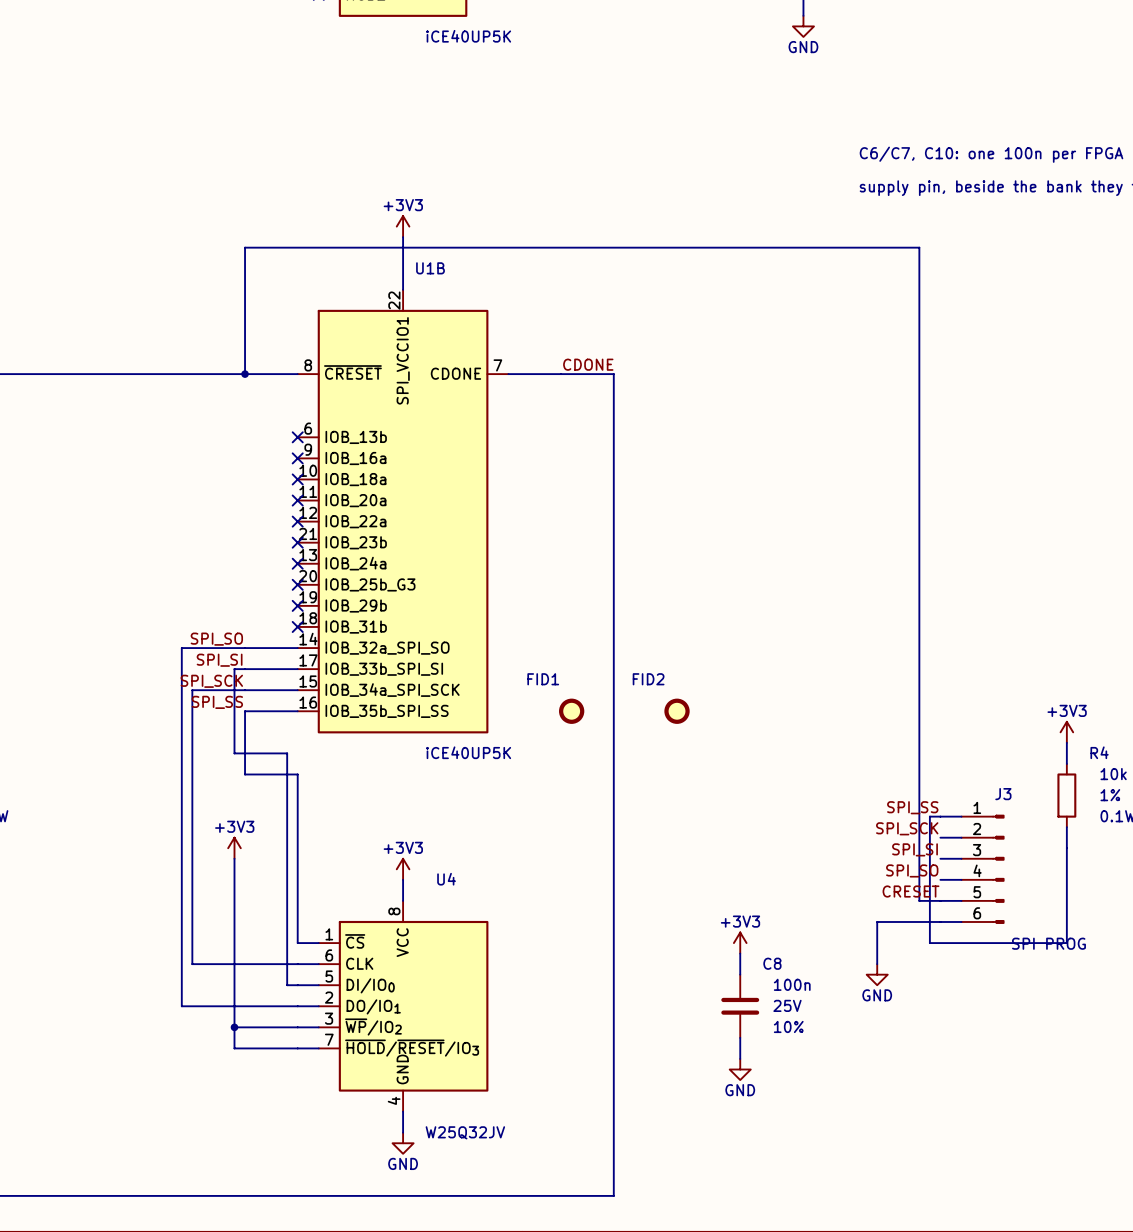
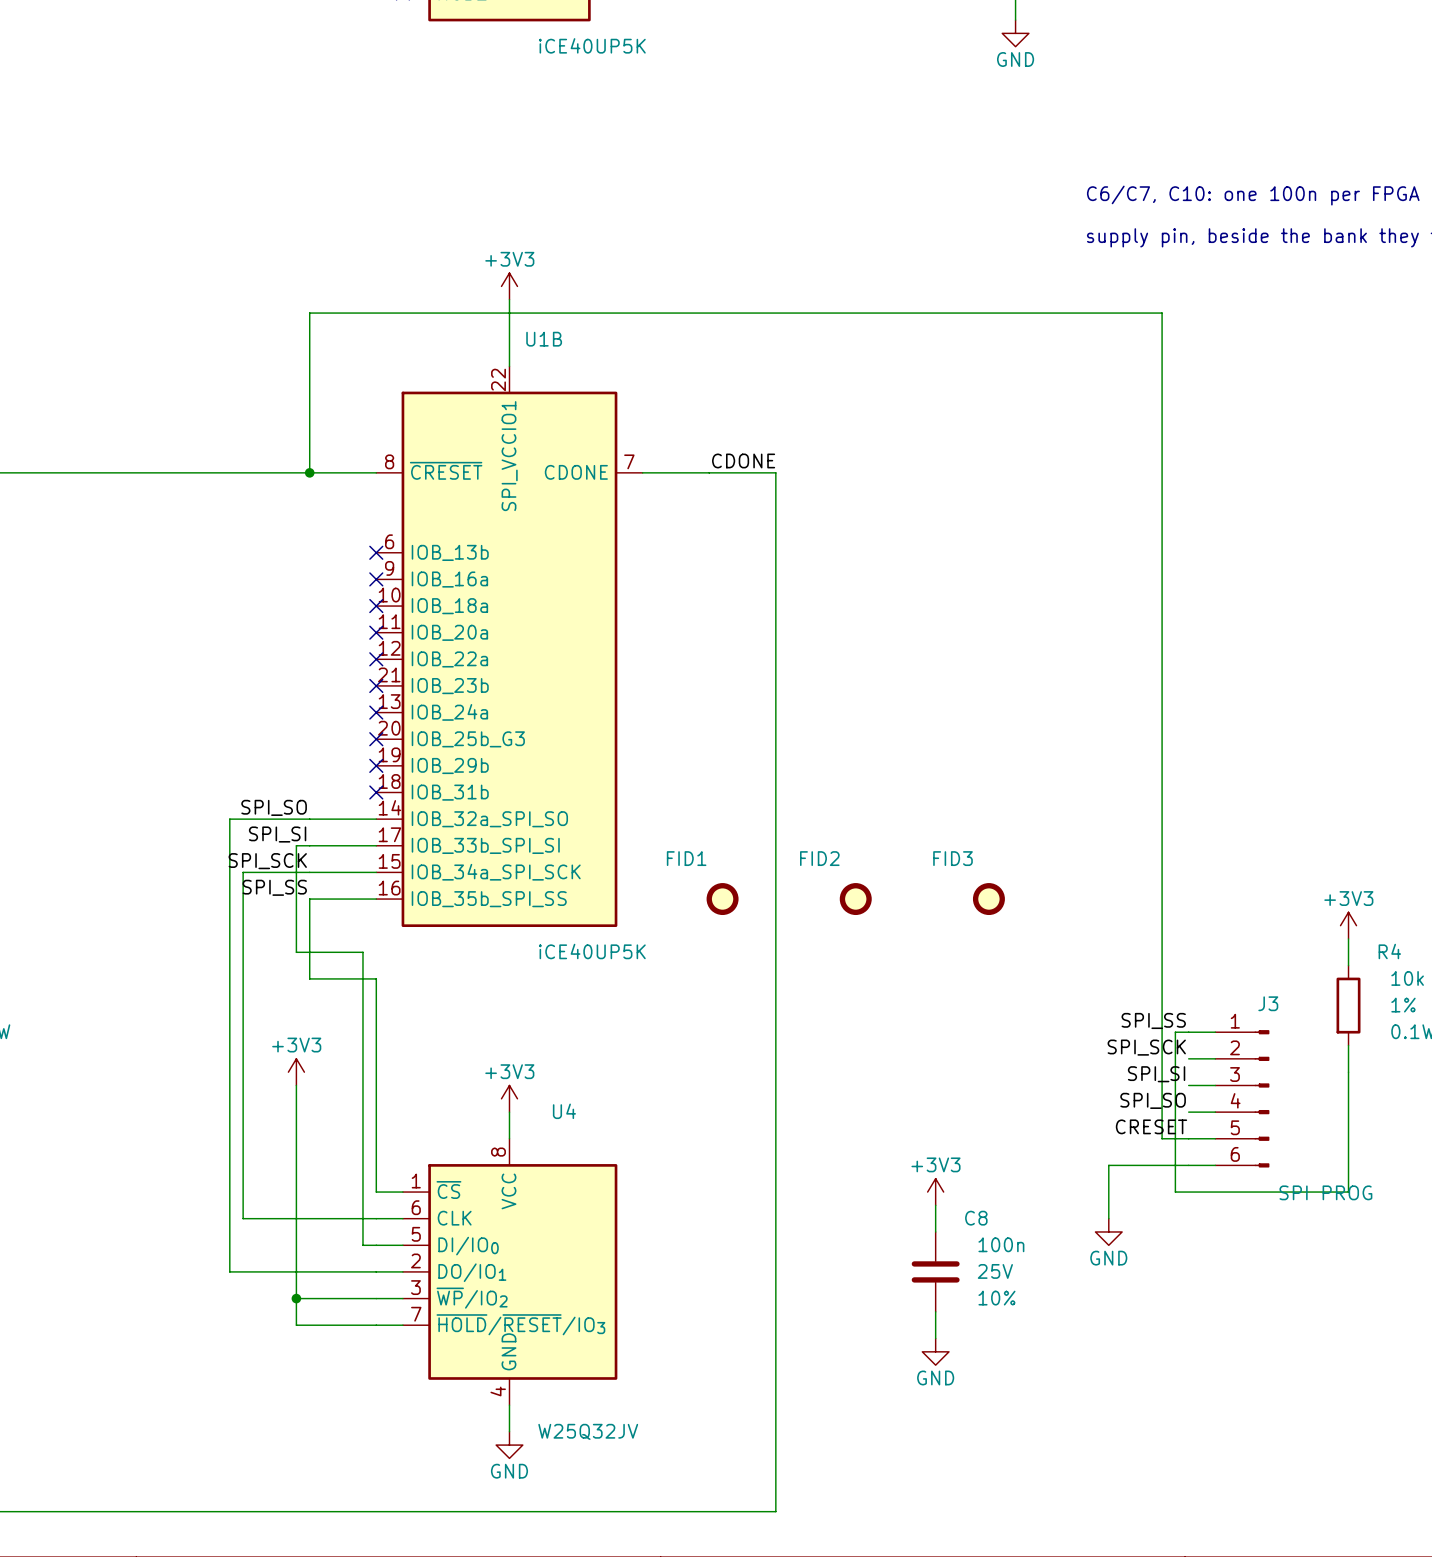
FID3: none -> (988, 899)

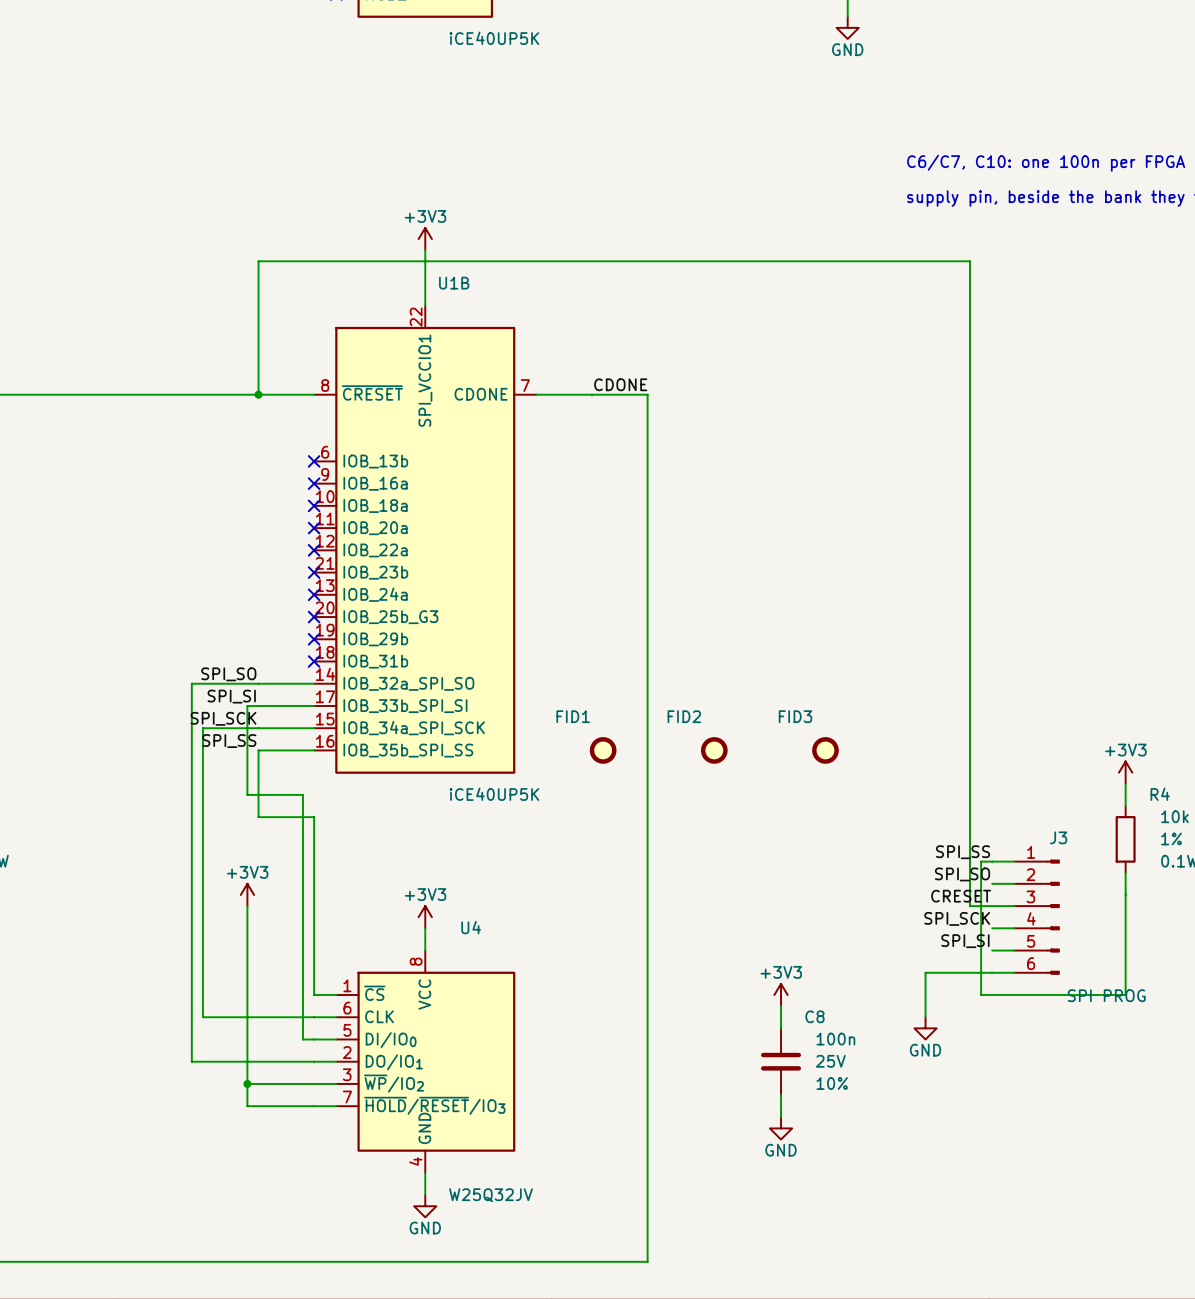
label: SPI_SCK (1146, 1047) -> SPI_SO (962, 874)
label: SPI_SI (1156, 1074) -> CRESET (961, 896)
wire: (1162, 1085) (1162, 1138) (1188, 1138) -> (970, 906) (992, 906)
label: SPI_SO (1153, 1100) -> SPI_SCK (957, 918)
label: CRESET (1151, 1126) -> SPI_SI (965, 941)

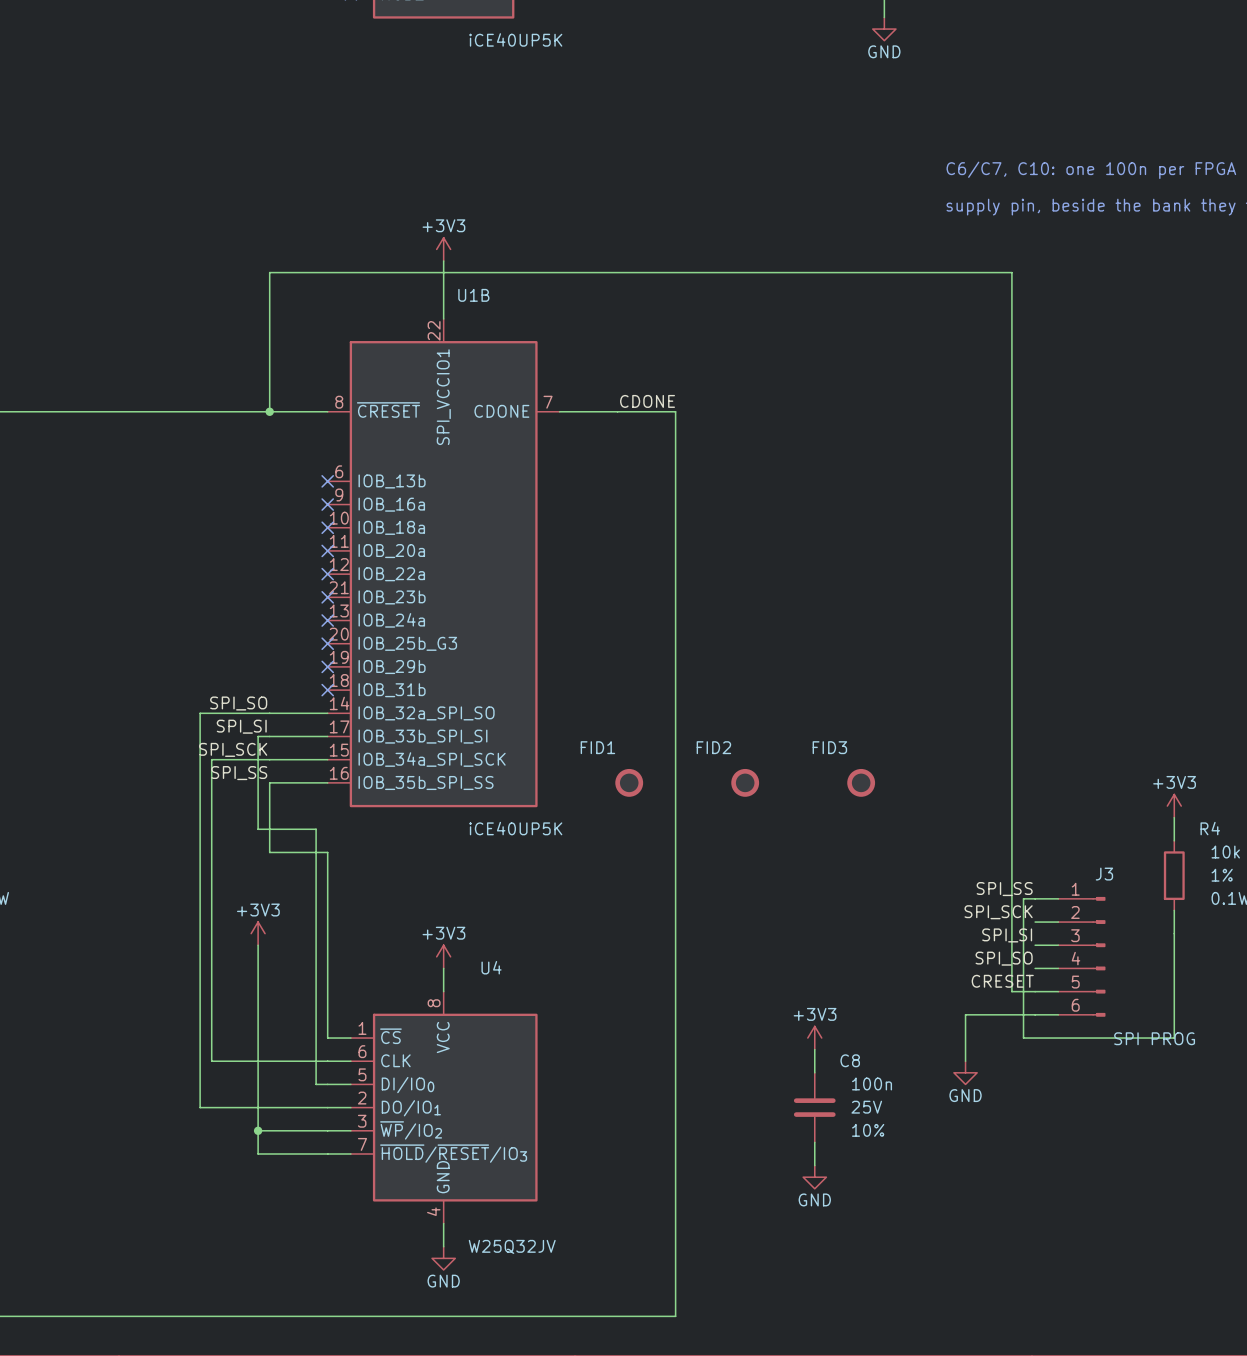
label: SPI_SO (962, 874) -> SPI_SCK (998, 912)
label: CRESET (961, 896) -> SPI_SI (1007, 935)
wire: (970, 906) (992, 906) -> (1011, 945) (1011, 991) (1035, 991)
label: SPI_SCK (957, 918) -> SPI_SO (1004, 958)
label: SPI_SI (965, 941) -> CRESET (1002, 981)

